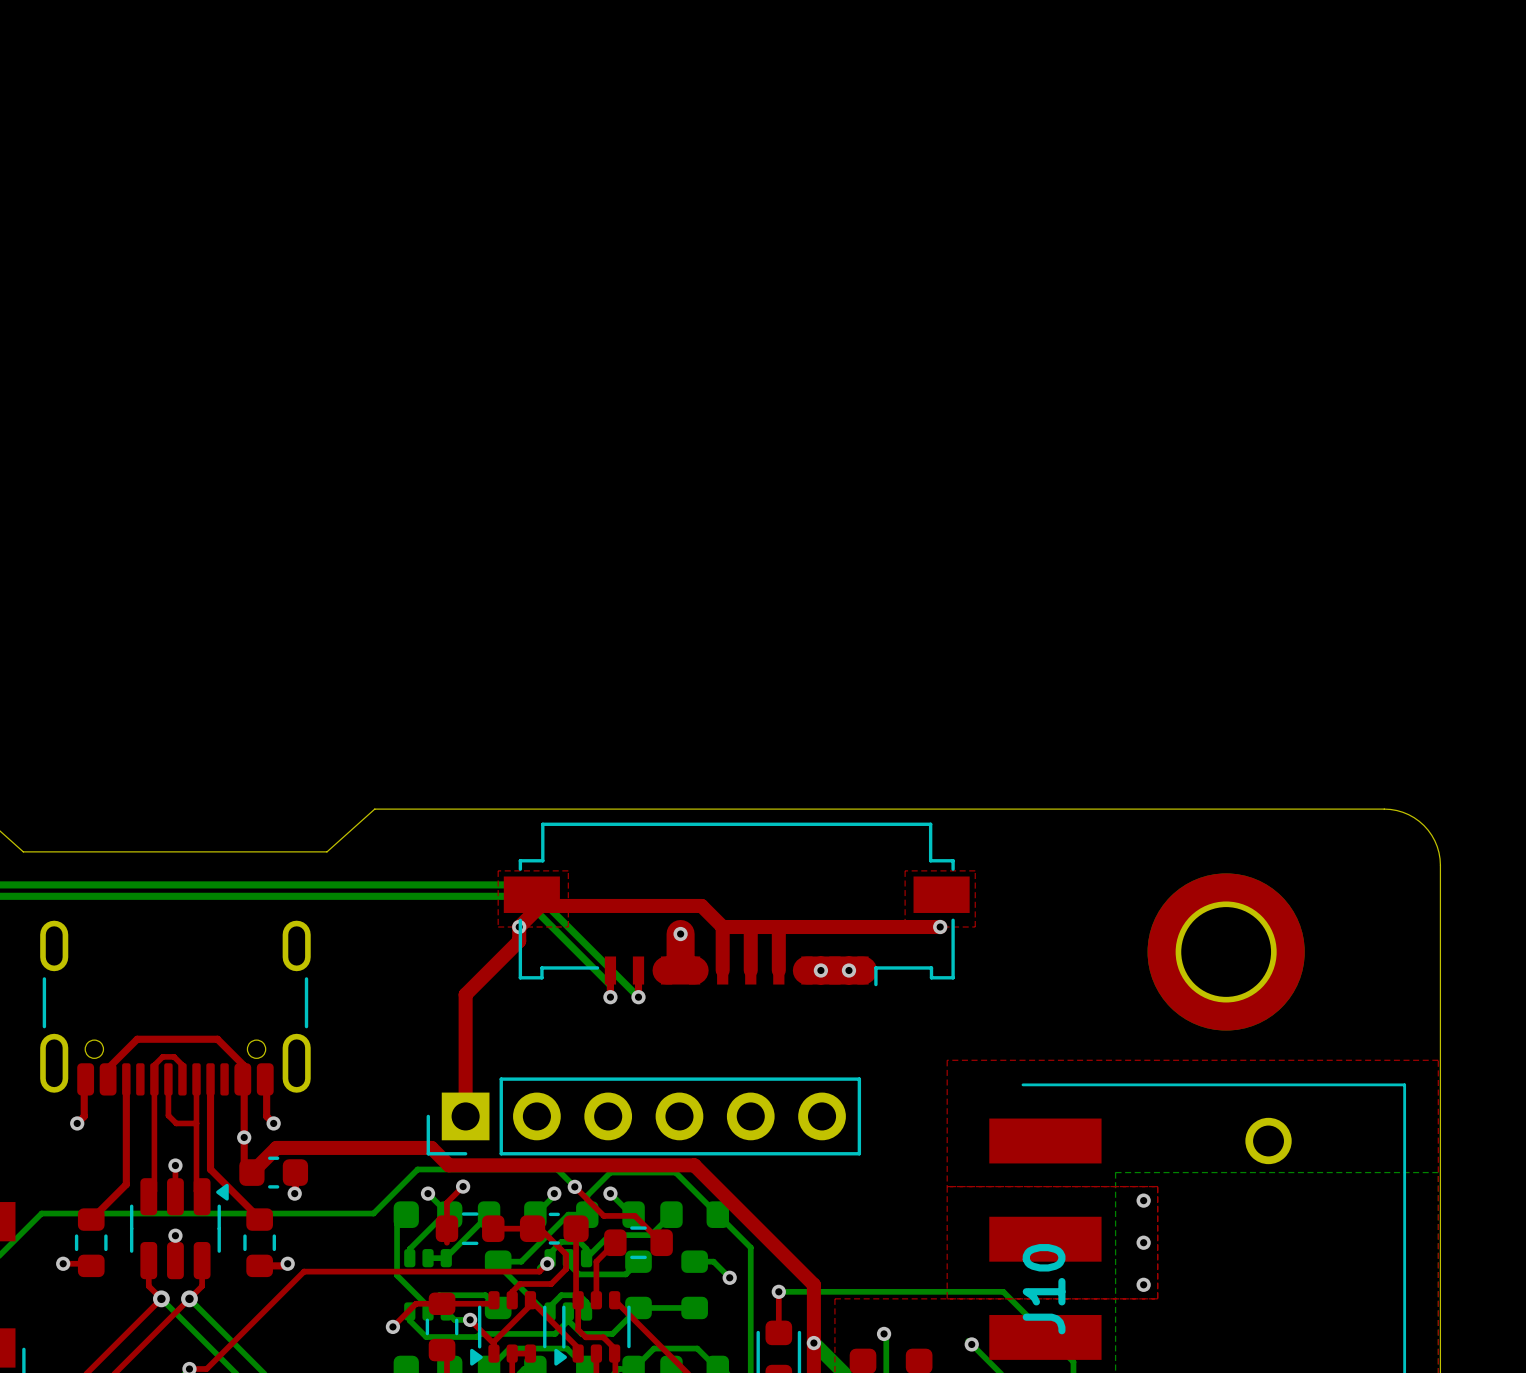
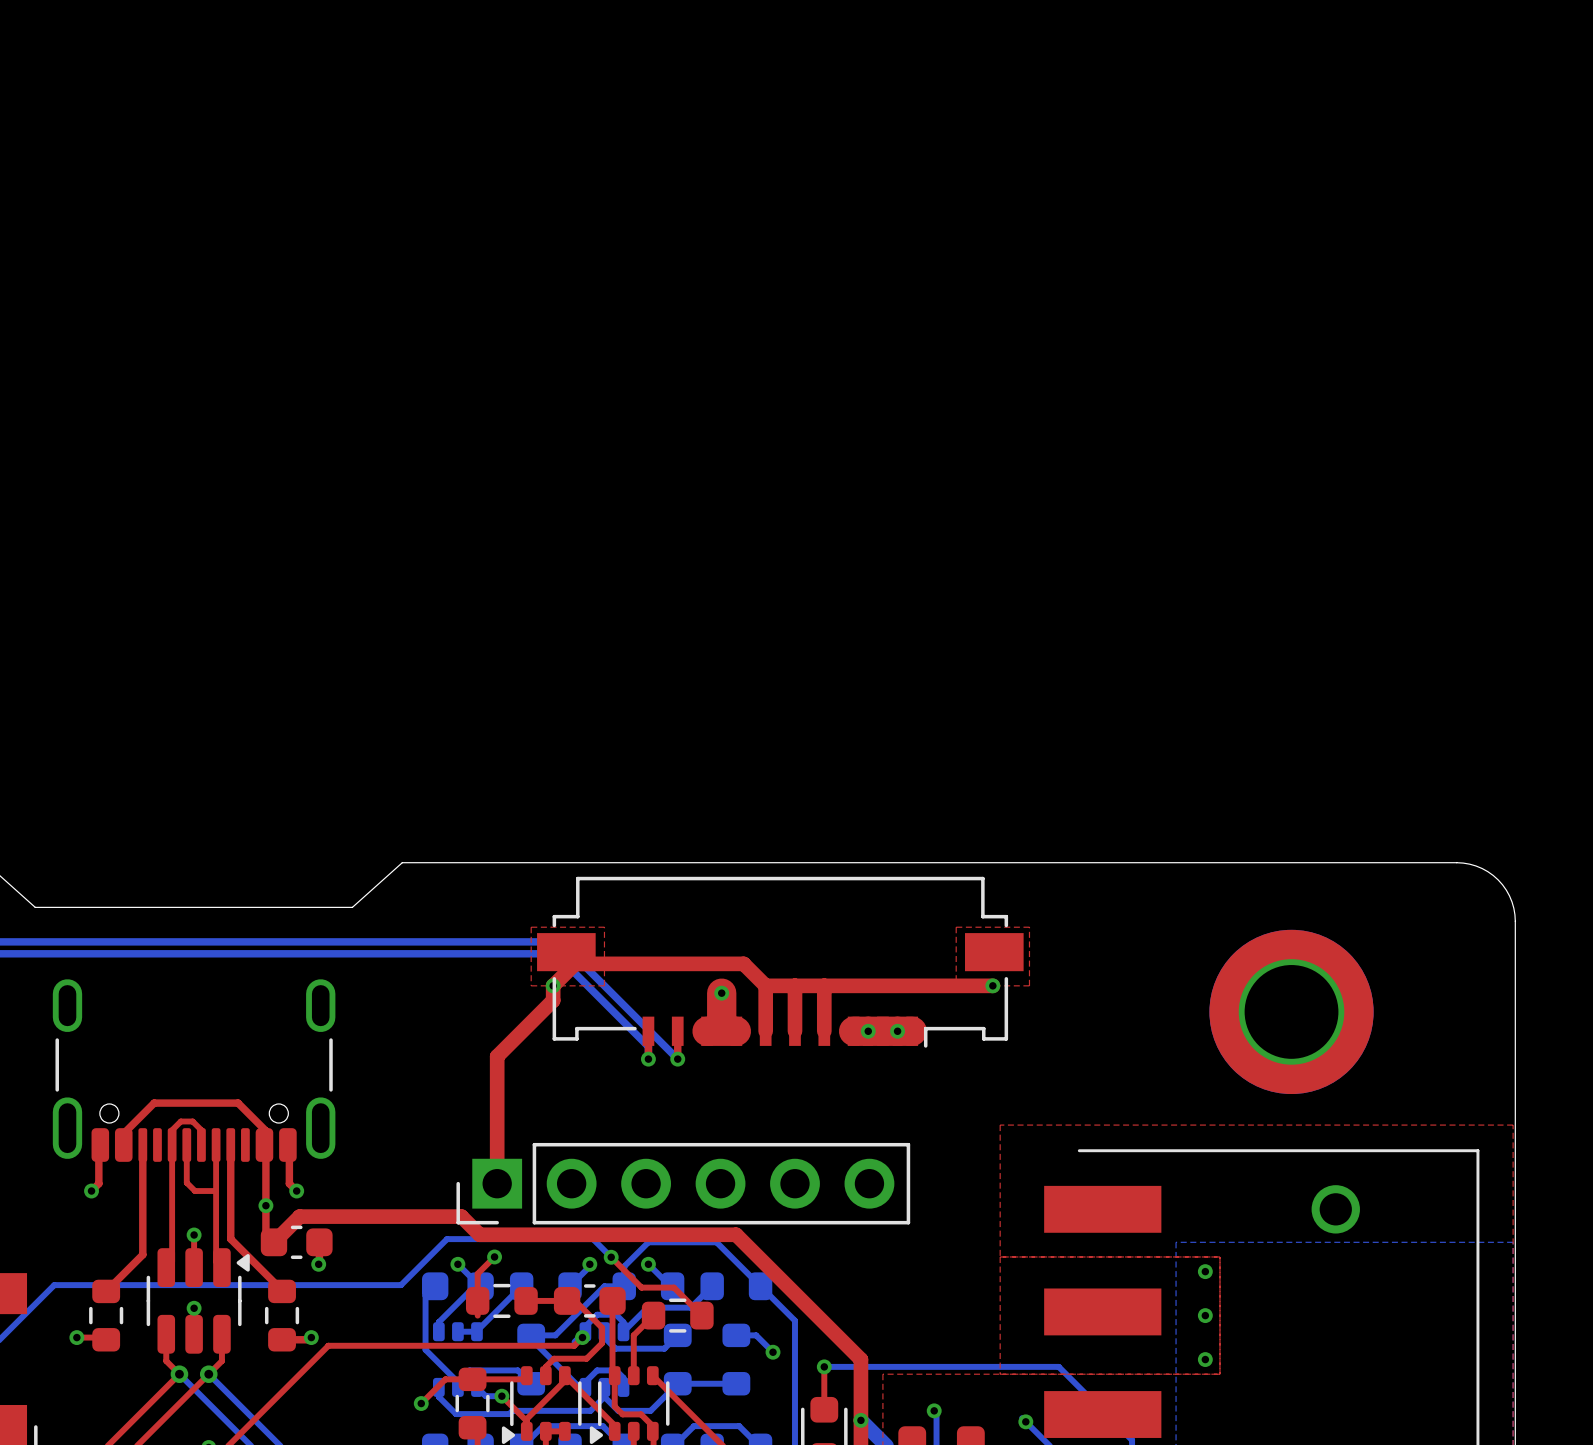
J10 name: J10 (1044, 1289) -> none

